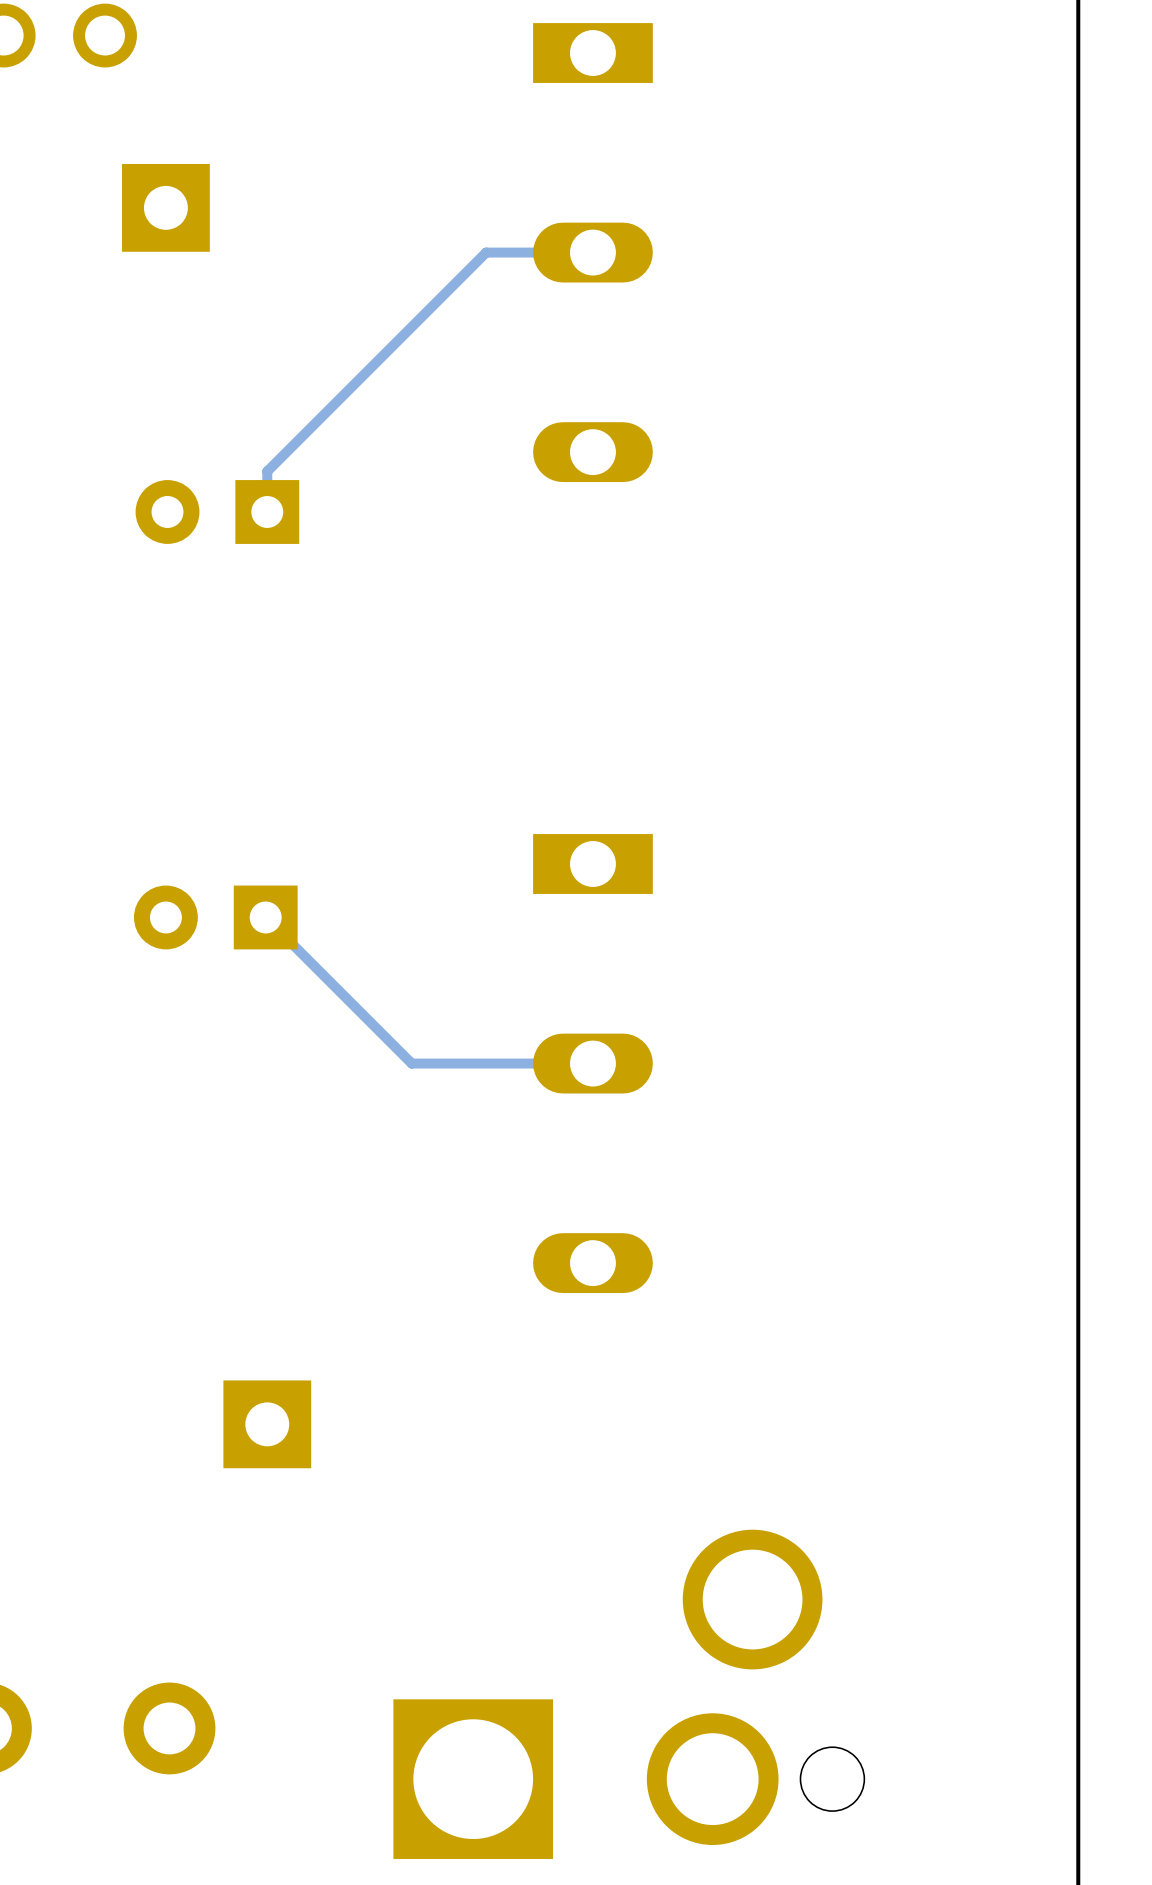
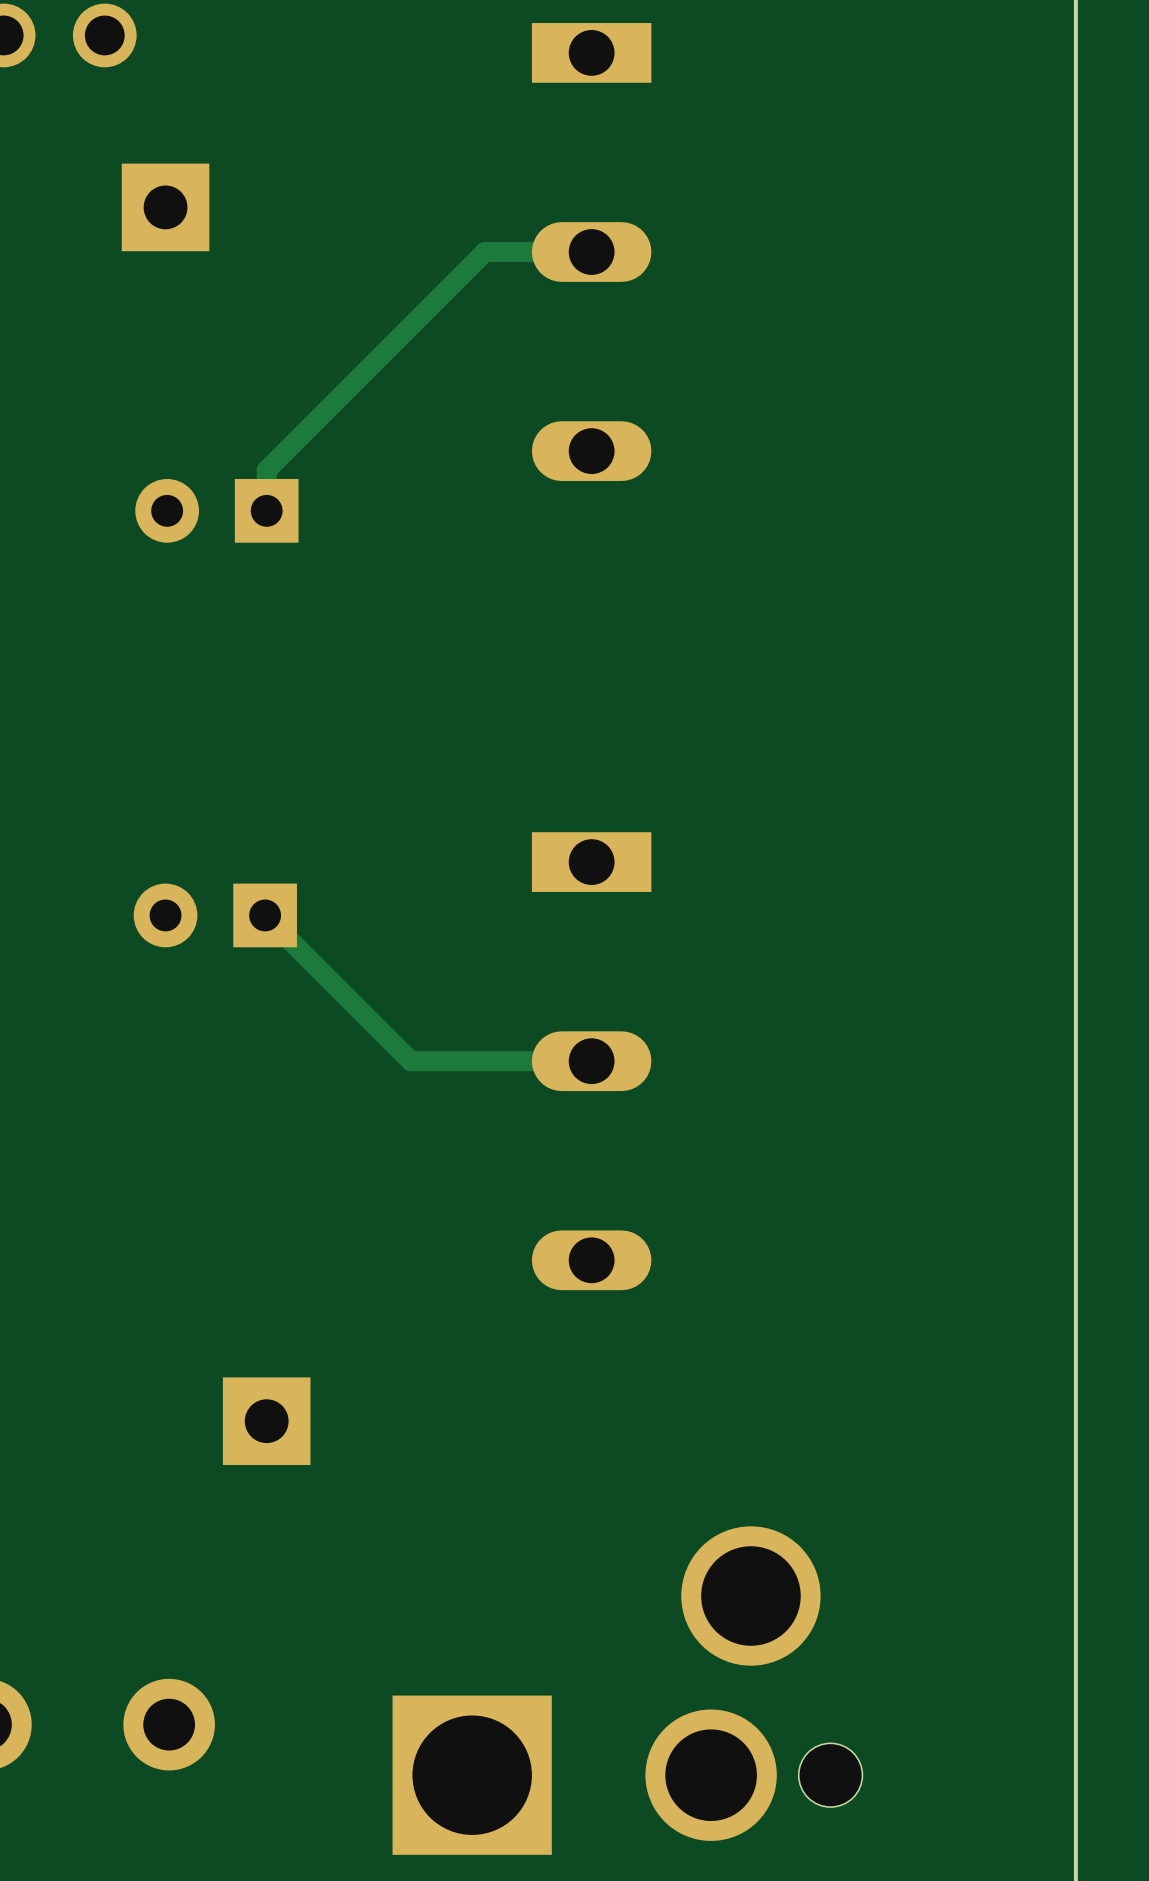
track width: thin (592, 252) (486, 252) (267, 471) (267, 501) -> thick (591, 252) (485, 252) (266, 470) (266, 500)
track width: thin (265, 917) (411, 1063) (592, 1063) -> thick (265, 915) (410, 1061) (591, 1061)

